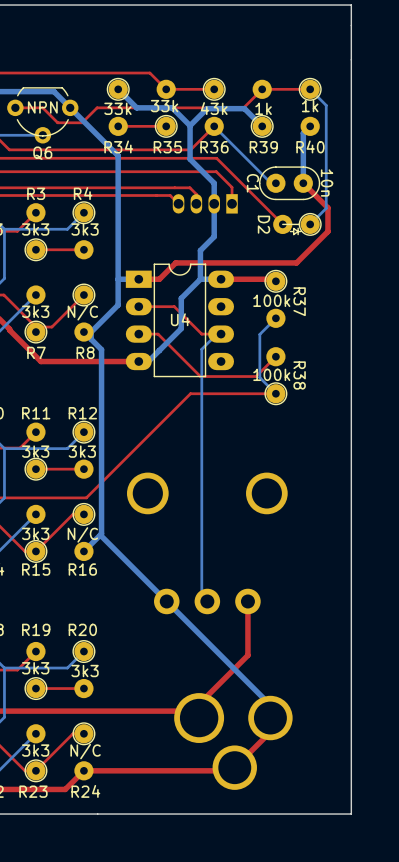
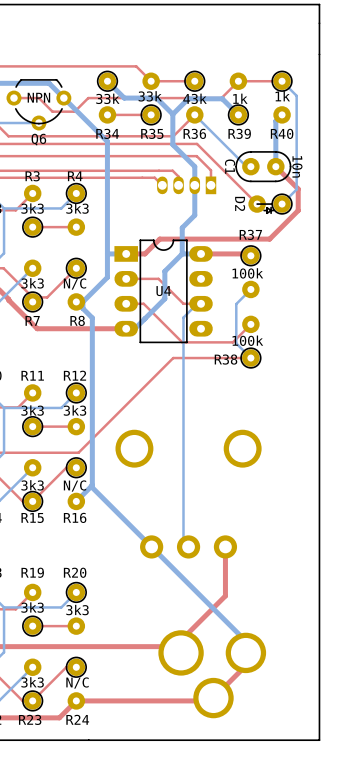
R37 name rotation: 0° (299, 301) -> 90° counterclockwise (250, 234)
R37 name position: R37 (299, 301) -> R37 (250, 234)
R38 name rotation: 0° (299, 375) -> 90° counterclockwise (225, 359)
R38 name position: R38 (299, 375) -> R38 (225, 359)

